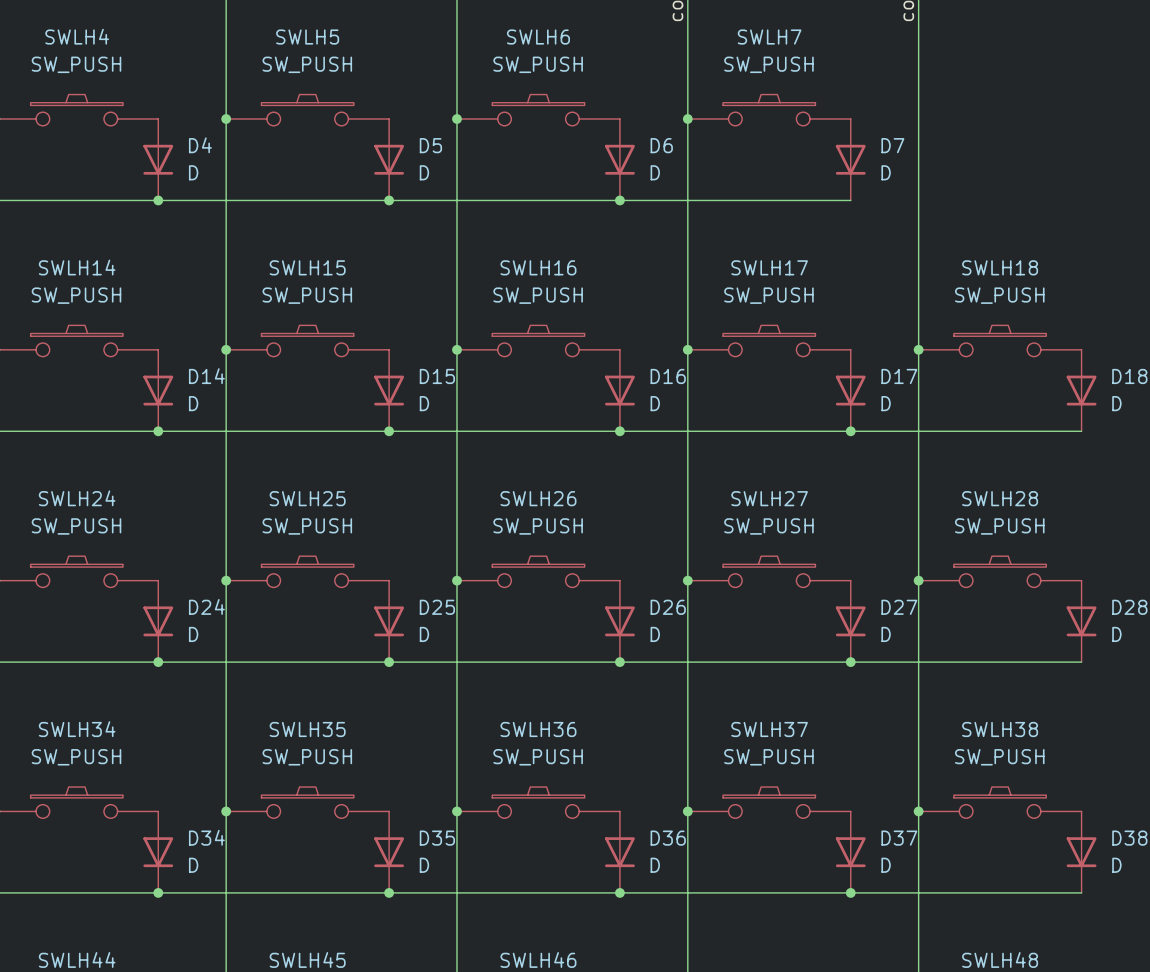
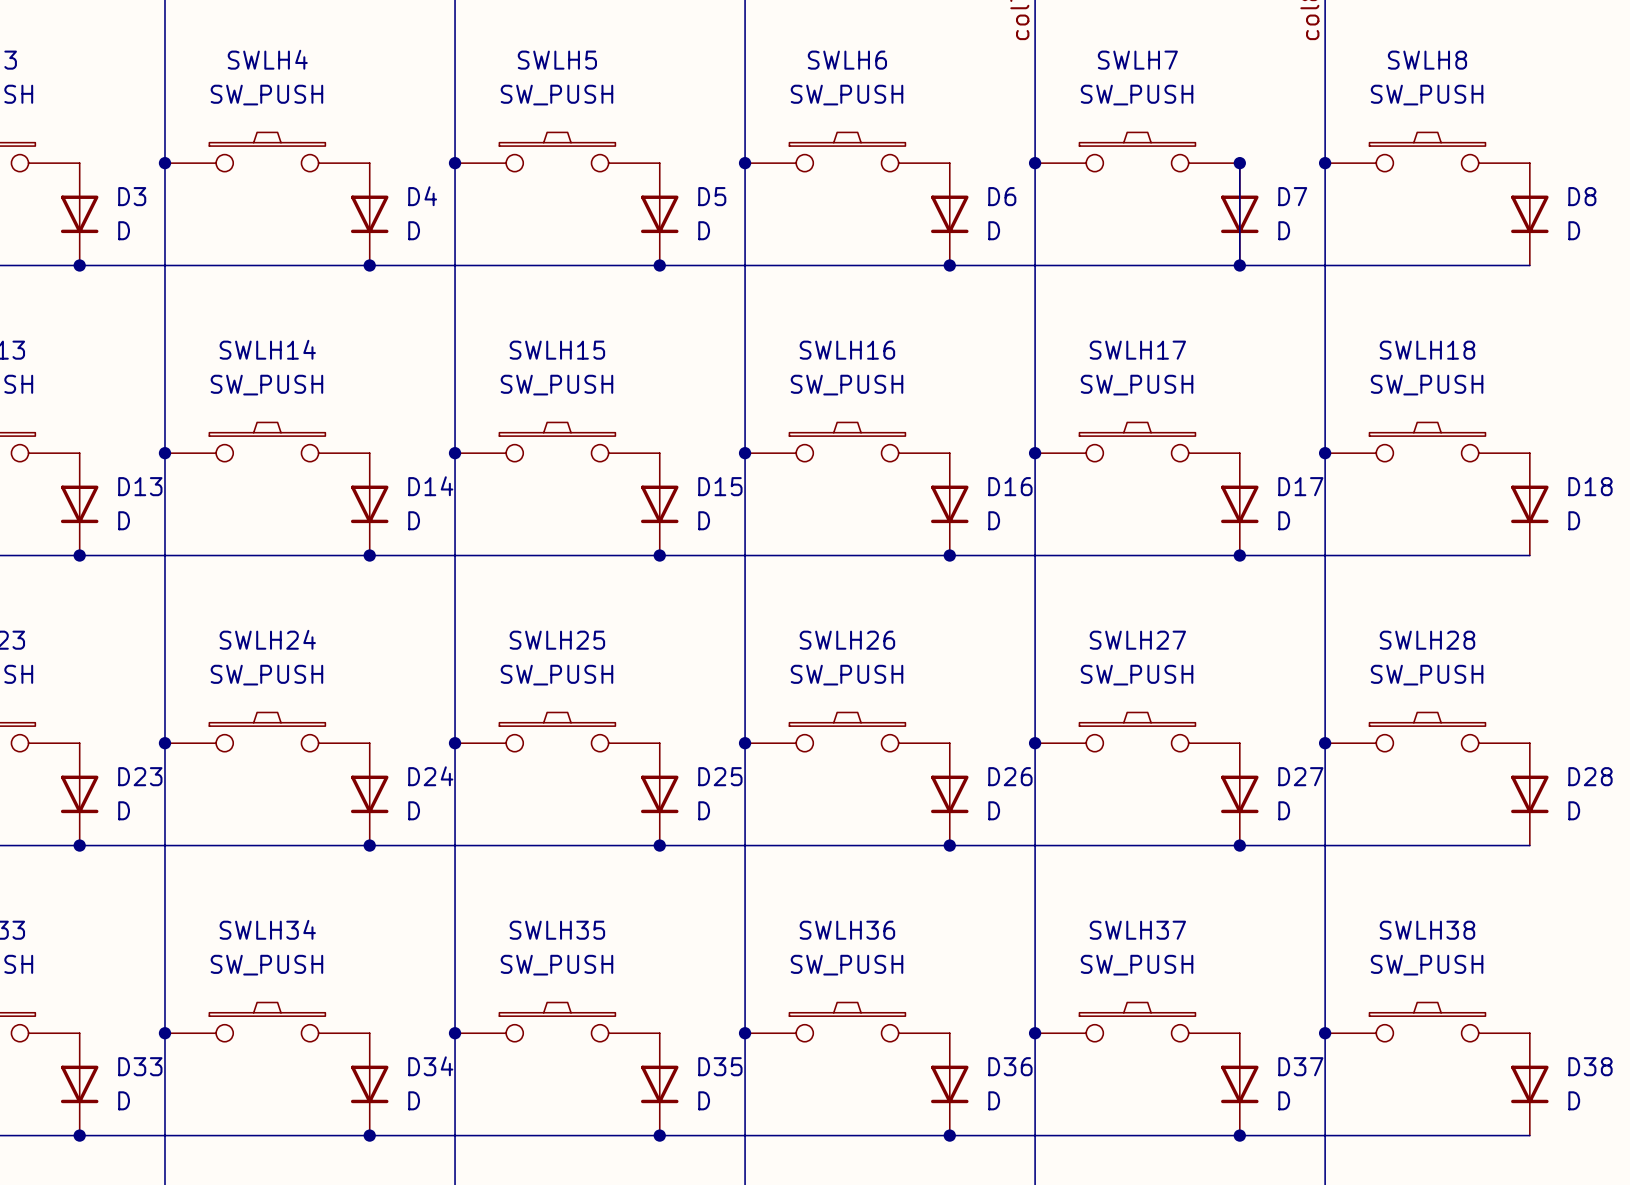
SWLH8: none -> SW_PUSH (1427, 152)
wire: none -> (1239, 163) (1239, 265) (1529, 265)
junction: none -> (1239, 163)
junction: none -> (1325, 163)
D8: none -> D (1529, 214)
junction: none -> (1239, 265)

